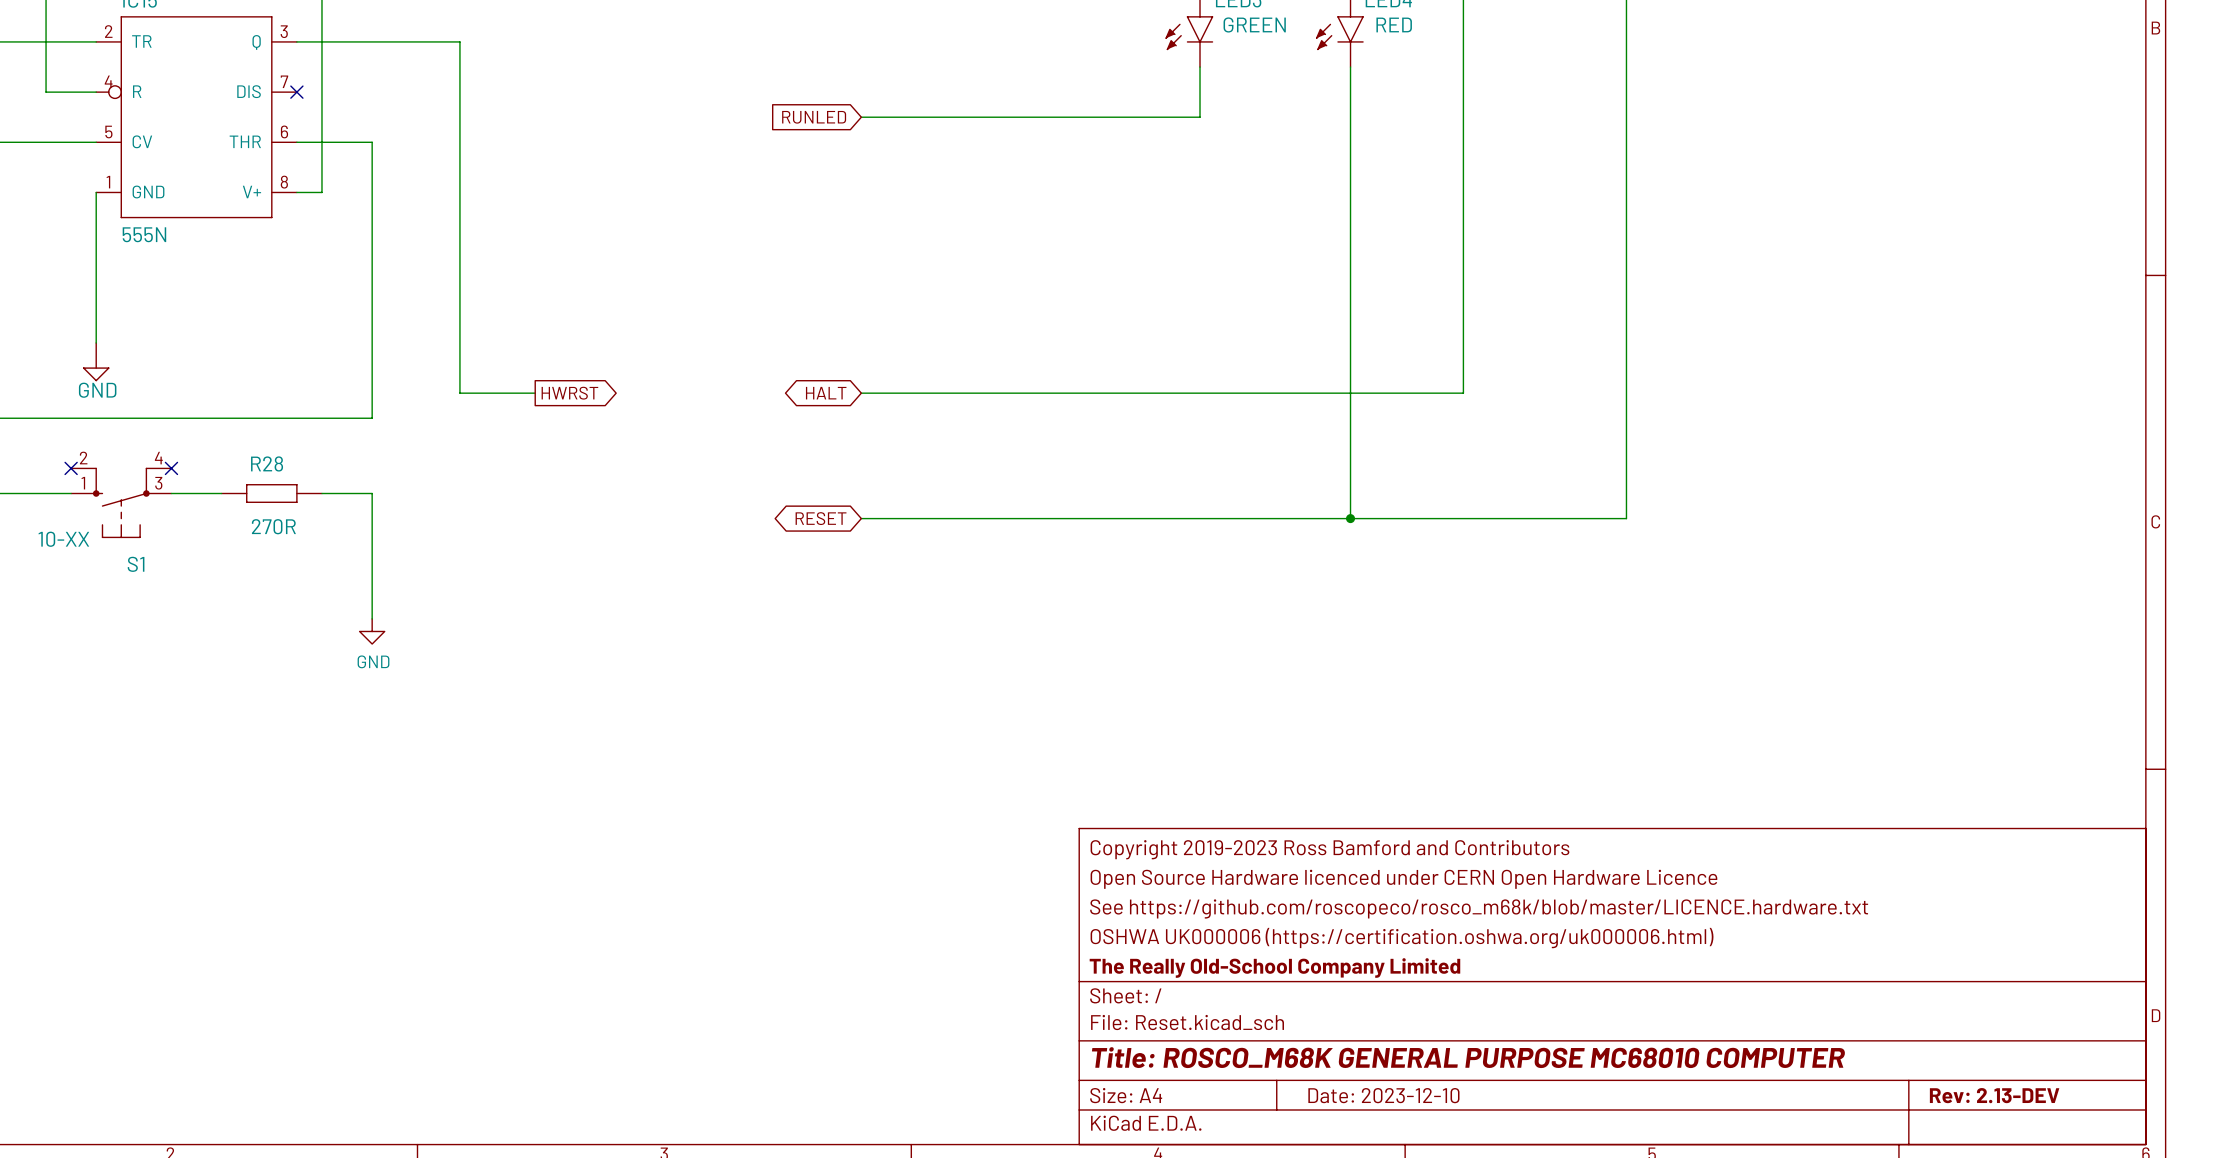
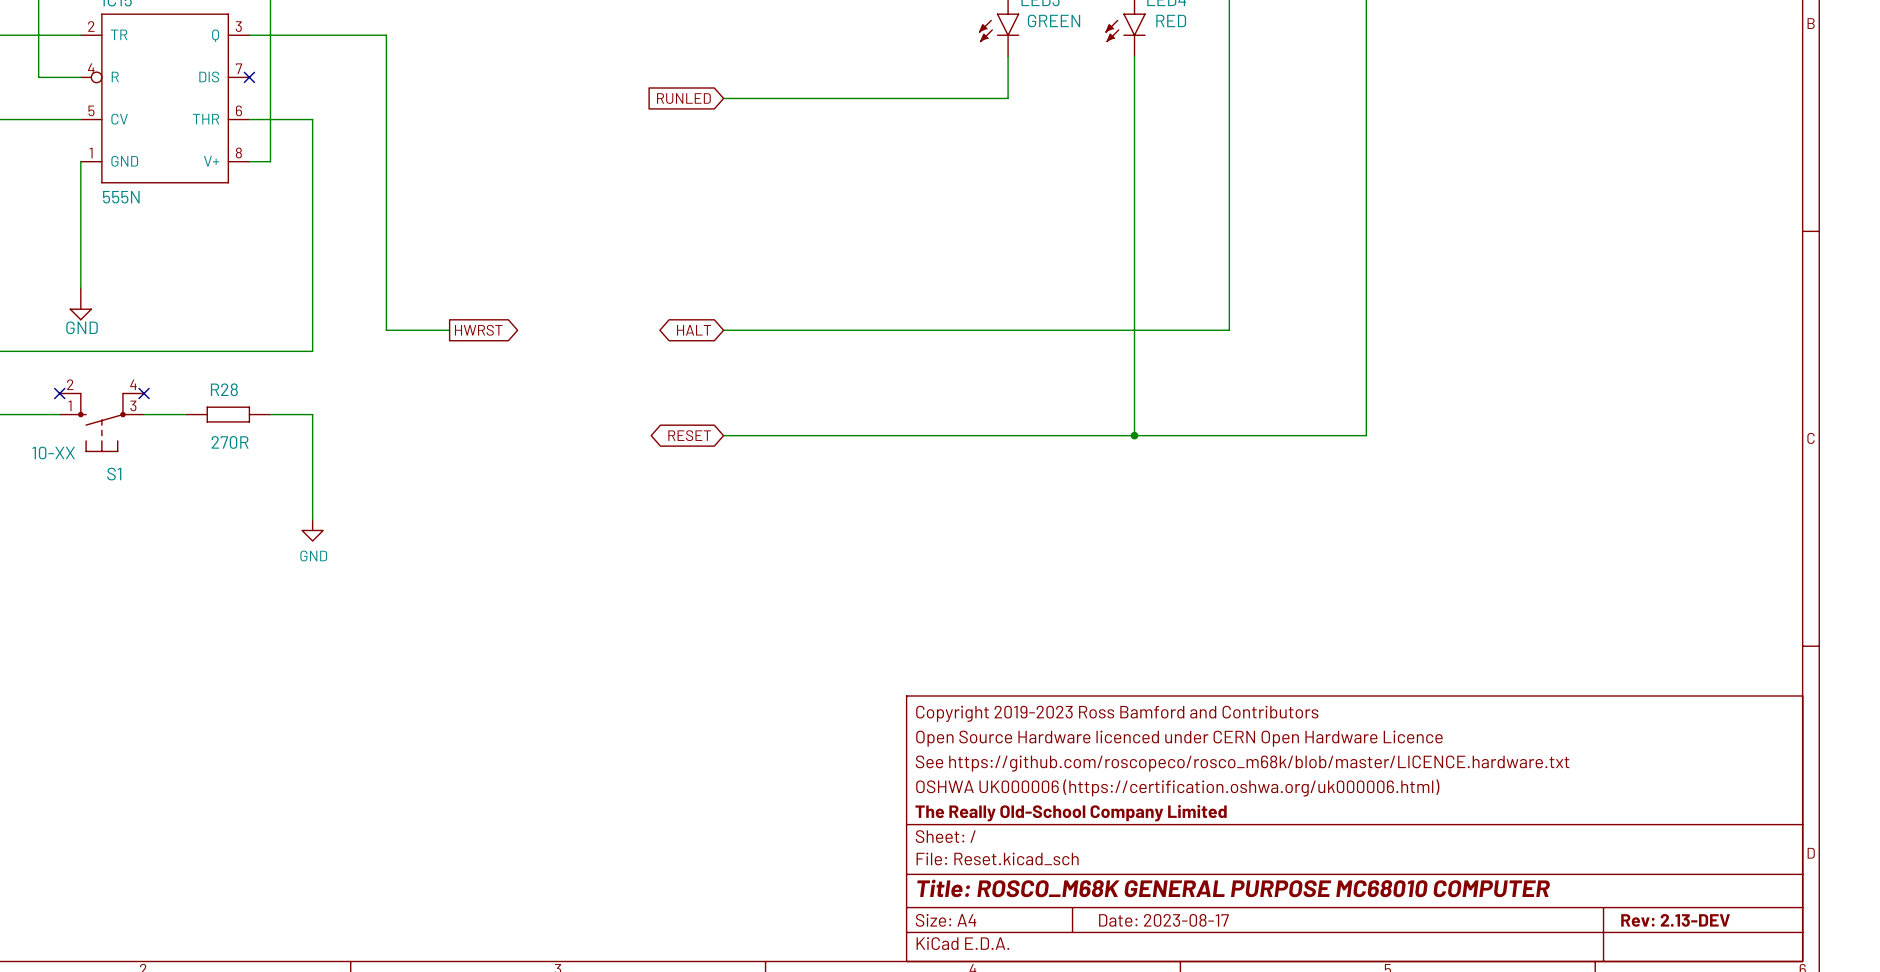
title block: Date: 2023-12-10 (1383, 1095) -> Date: 2023-08-17 (1163, 920)

